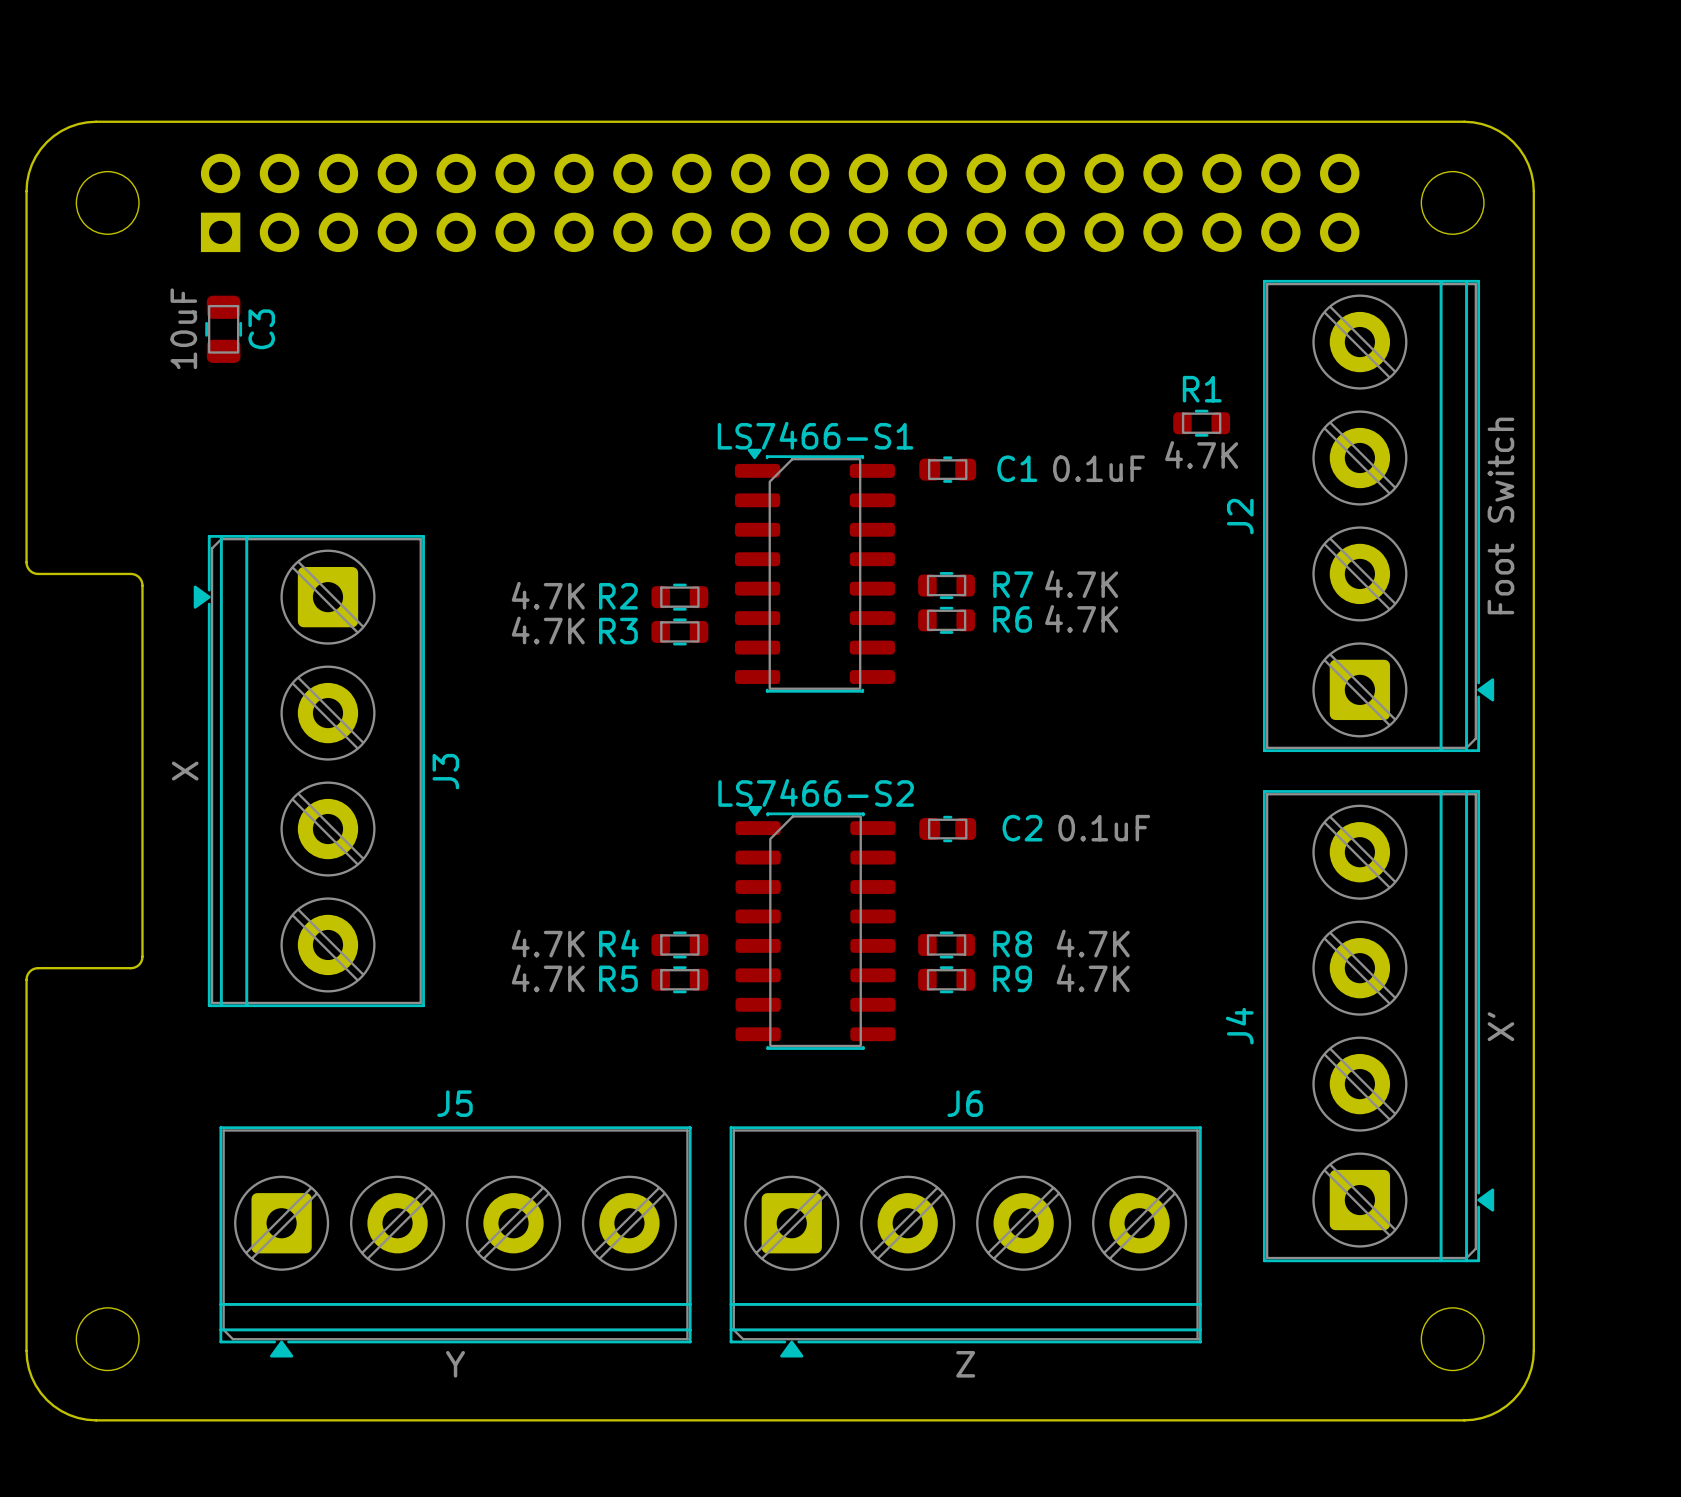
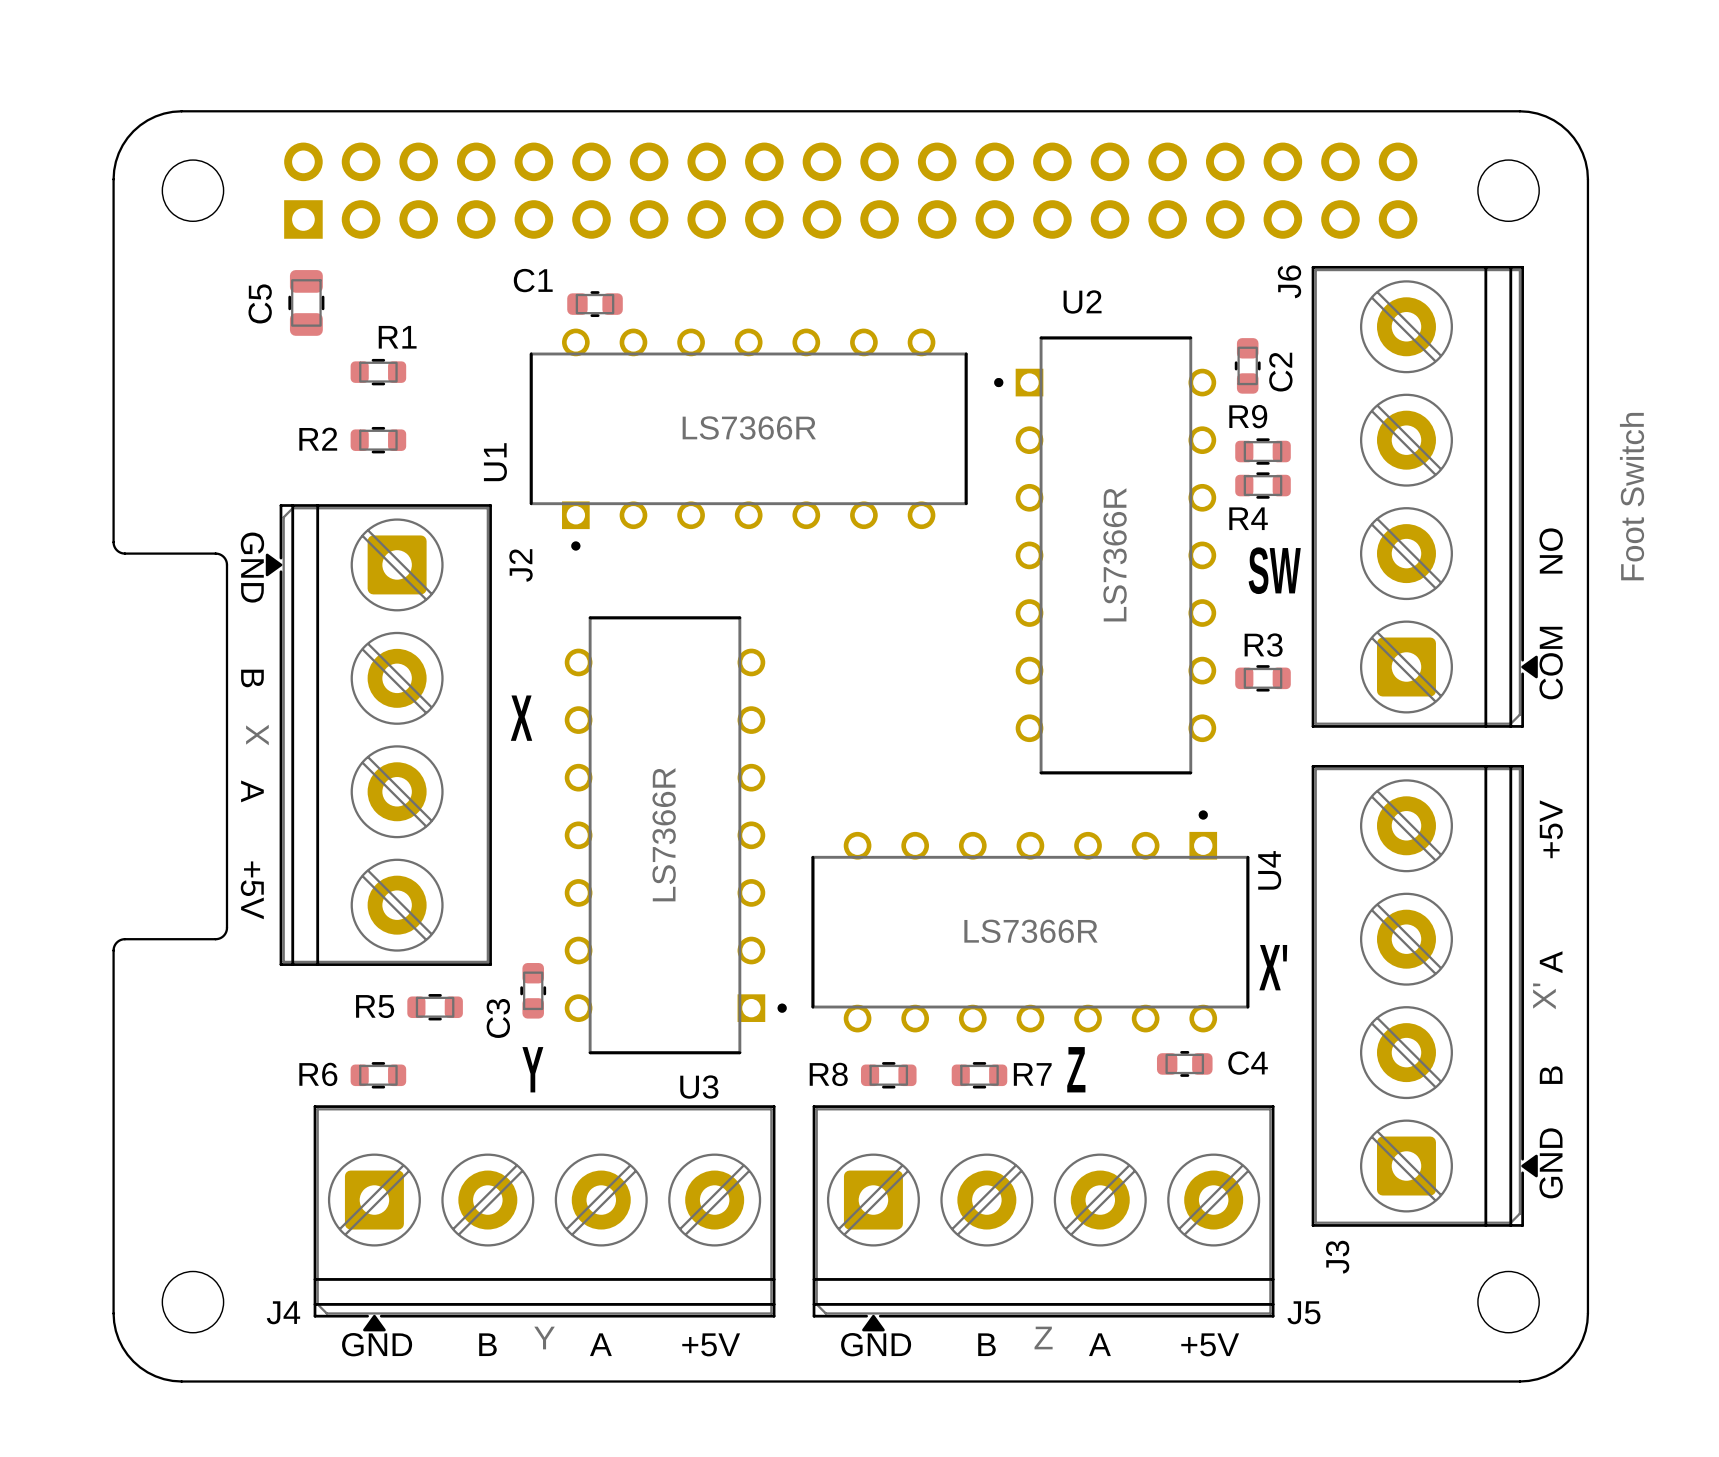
C3 footprint: [205, 295, 243, 363] -> [520, 963, 547, 1019]
C5: none -> (306, 302)
C3 value: 10uF (183, 328) -> none
C3 name position: C3 (261, 329) -> C3 (498, 1018)
R1 name position: R1 (1202, 389) -> R1 (397, 337)
R1 position: (1201, 423) -> (378, 372)
R1 value: 4.7K (1201, 454) -> none
U1: none -> LS7366R (748, 439)
C1 name position: C1 (1017, 468) -> C1 (533, 280)
C1 value: 0.1uF (1098, 468) -> none
C1 position: (947, 469) -> (595, 304)
J2 rotation: 0° (1378, 515) -> 180° (378, 735)
J2 position: (1378, 515) -> (378, 735)
J2 value: Foot Switch (1500, 515) -> X (257, 735)
J2 name position: J2 (1240, 516) -> J2 (521, 565)
LS7466-S1: (814, 570) -> none
text: none -> NO (1551, 550)
U2: none -> LS7366R (1105, 555)
R7 name position: R7 (1013, 584) -> R7 (1032, 1074)
R7 value: 4.7K (1081, 584) -> none
R7 position: (946, 585) -> (979, 1075)
text: none -> GND (252, 567)
text: none -> SW (1274, 570)
R2 value: 4.7K (548, 595) -> none
R2 position: (679, 597) -> (378, 440)
R6 value: 4.7K (1081, 618) -> none
R6 name position: R6 (1012, 619) -> R6 (318, 1074)
R6 position: (946, 620) -> (378, 1075)
R3 value: 4.7K (548, 630) -> none
R3 name position: R3 (618, 631) -> R3 (1263, 645)
R3 position: (679, 631) -> (1263, 678)
text: none -> COM (1551, 663)
text: none -> B (252, 678)
text: none -> X (521, 718)
J3 value: X (185, 771) -> X' (1544, 996)
J3 rotation: 0° (309, 771) -> 180° (1424, 995)
J3 position: (309, 771) -> (1424, 995)
J3 name position: J3 (445, 771) -> J3 (1337, 1257)
text: none -> A (252, 791)
C2 value: 0.1uF (1104, 828) -> none
C2 rotation: 0° (947, 829) -> 90° clockwise (1247, 365)
C2 position: (947, 829) -> (1247, 365)
text: none -> +5V (1551, 829)
U3: none -> LS7366R (675, 835)
text: none -> +5V (252, 890)
LS7466-S2: (815, 927) -> none
R4 value: 4.7K (548, 943) -> none
R4 name position: R4 (618, 943) -> R4 (1248, 518)
R8 value: 4.7K (1093, 943) -> none
R4 position: (679, 944) -> (1263, 485)
R8 position: (946, 944) -> (888, 1075)
R8 name position: R8 (1012, 944) -> R8 (828, 1074)
U4: none -> LS7366R (1030, 921)
R5 value: 4.7K (548, 978) -> none
R9 name position: R9 (1012, 978) -> R9 (1248, 416)
R9 value: 4.7K (1093, 978) -> none
R5 position: (679, 979) -> (435, 1007)
R9 position: (946, 979) -> (1263, 451)
text: none -> A (1551, 962)
text: none -> X' (1273, 967)
J4 name position: J4 (1239, 1026) -> J4 (283, 1312)
J4 rotation: 0° (1378, 1026) -> 90° clockwise (544, 1218)
J4 position: (1378, 1026) -> (544, 1218)
J4 value: X' (1500, 1026) -> Y (544, 1338)
C4: none -> (1184, 1063)
text: none -> Y (532, 1069)
text: none -> Z (1076, 1069)
J5 name position: J5 (454, 1103) -> J5 (1303, 1312)
J6 name position: J6 (965, 1103) -> J6 (1289, 281)
text: none -> B (1551, 1075)
text: none -> GND (1551, 1163)
J5 position: (455, 1241) -> (1043, 1218)
J6 rotation: 0° (965, 1241) -> 90° counterclockwise (1424, 496)
J6 position: (965, 1241) -> (1424, 496)
J5 value: Y (455, 1364) -> Z (1043, 1338)
J6 value: Z (965, 1364) -> Foot Switch (1632, 496)
text: none -> GND (377, 1344)
text: none -> B (487, 1344)
text: none -> A (600, 1344)
text: none -> +5V (711, 1344)
text: none -> GND (876, 1344)
text: none -> B (986, 1344)
text: none -> A (1099, 1344)
text: none -> +5V (1210, 1344)

